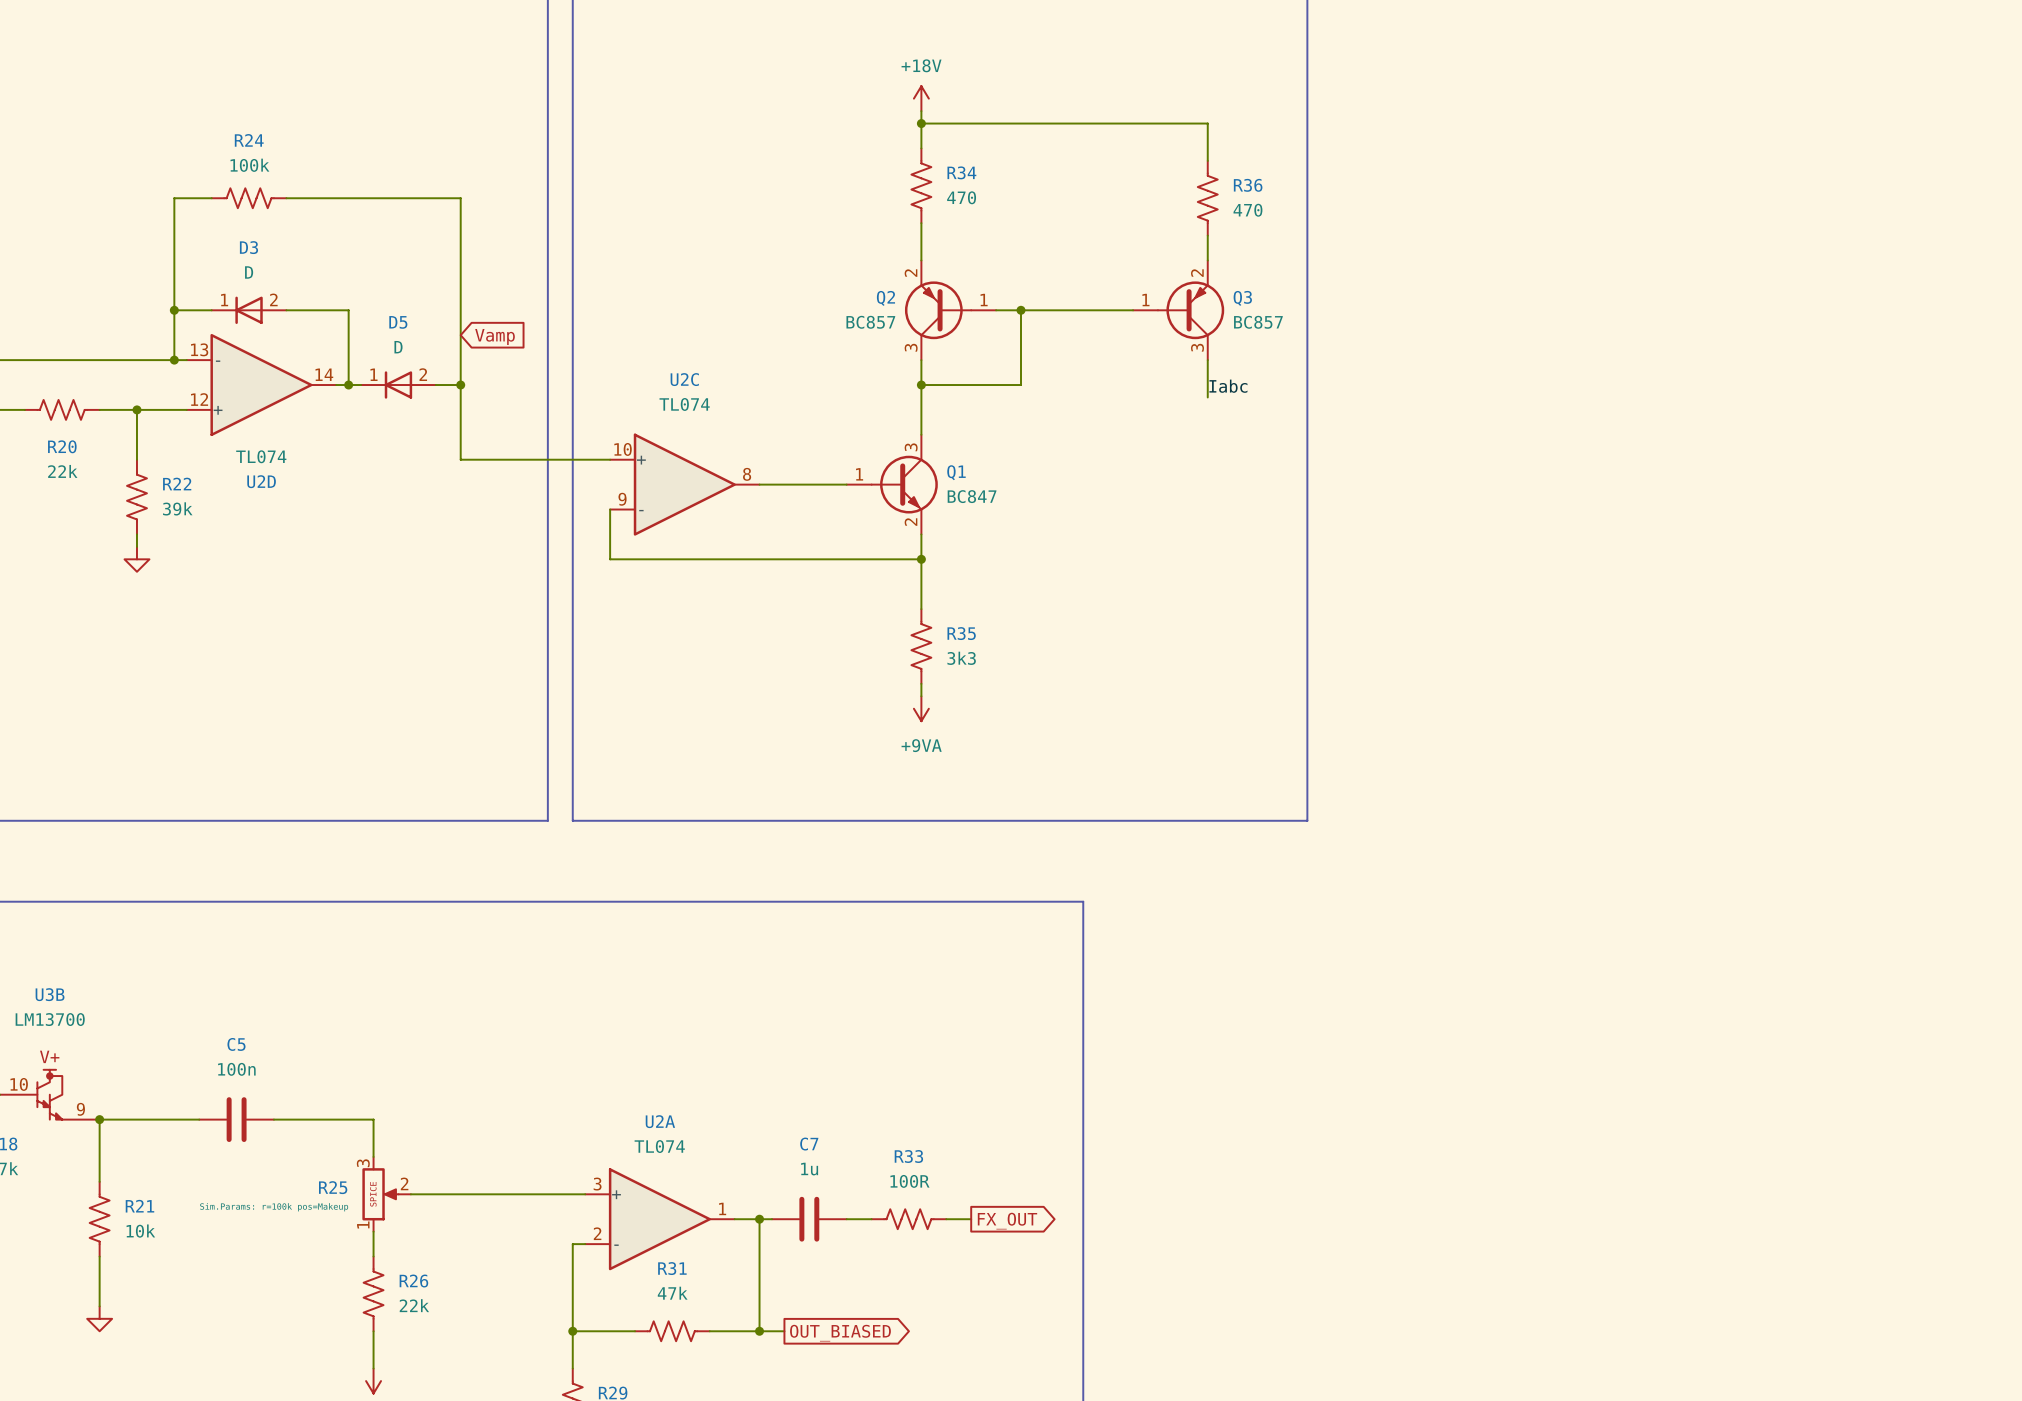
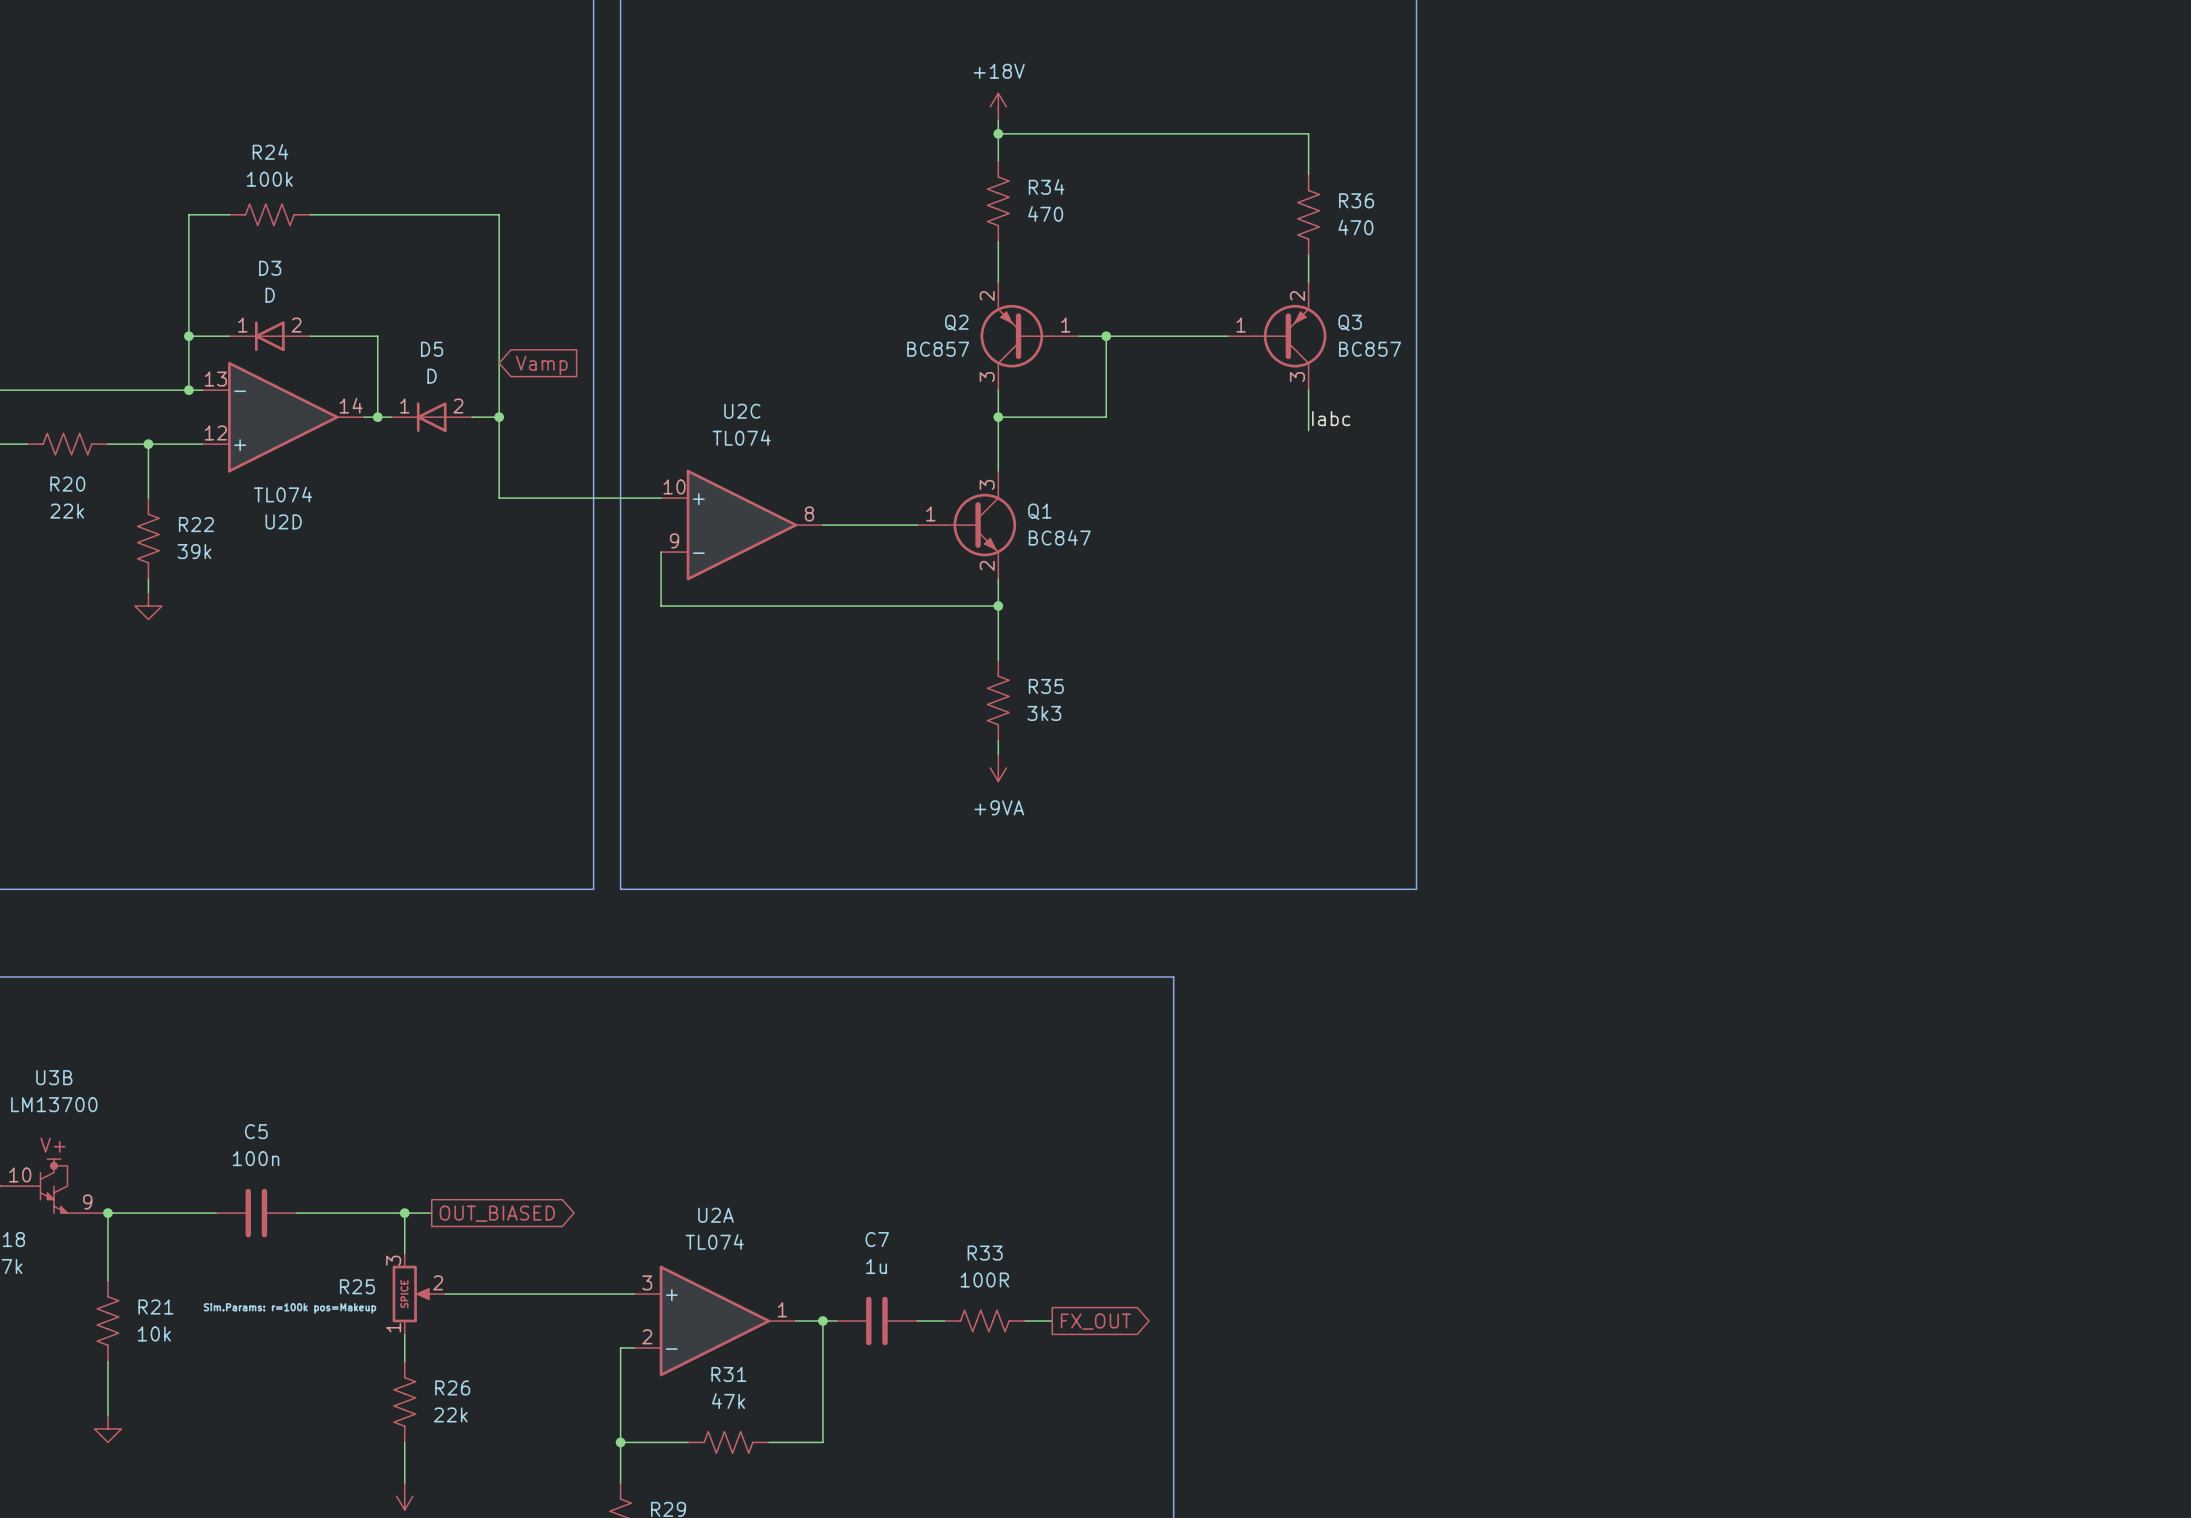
wire: none -> (404, 1213) (431, 1213)
junction: none -> (404, 1213)
global label: none -> OUT_BIASED (497, 1213)
wire: (759, 1331) (784, 1331) -> none
junction: (759, 1331) -> none
global label: OUT_BIASED (840, 1333) -> none

